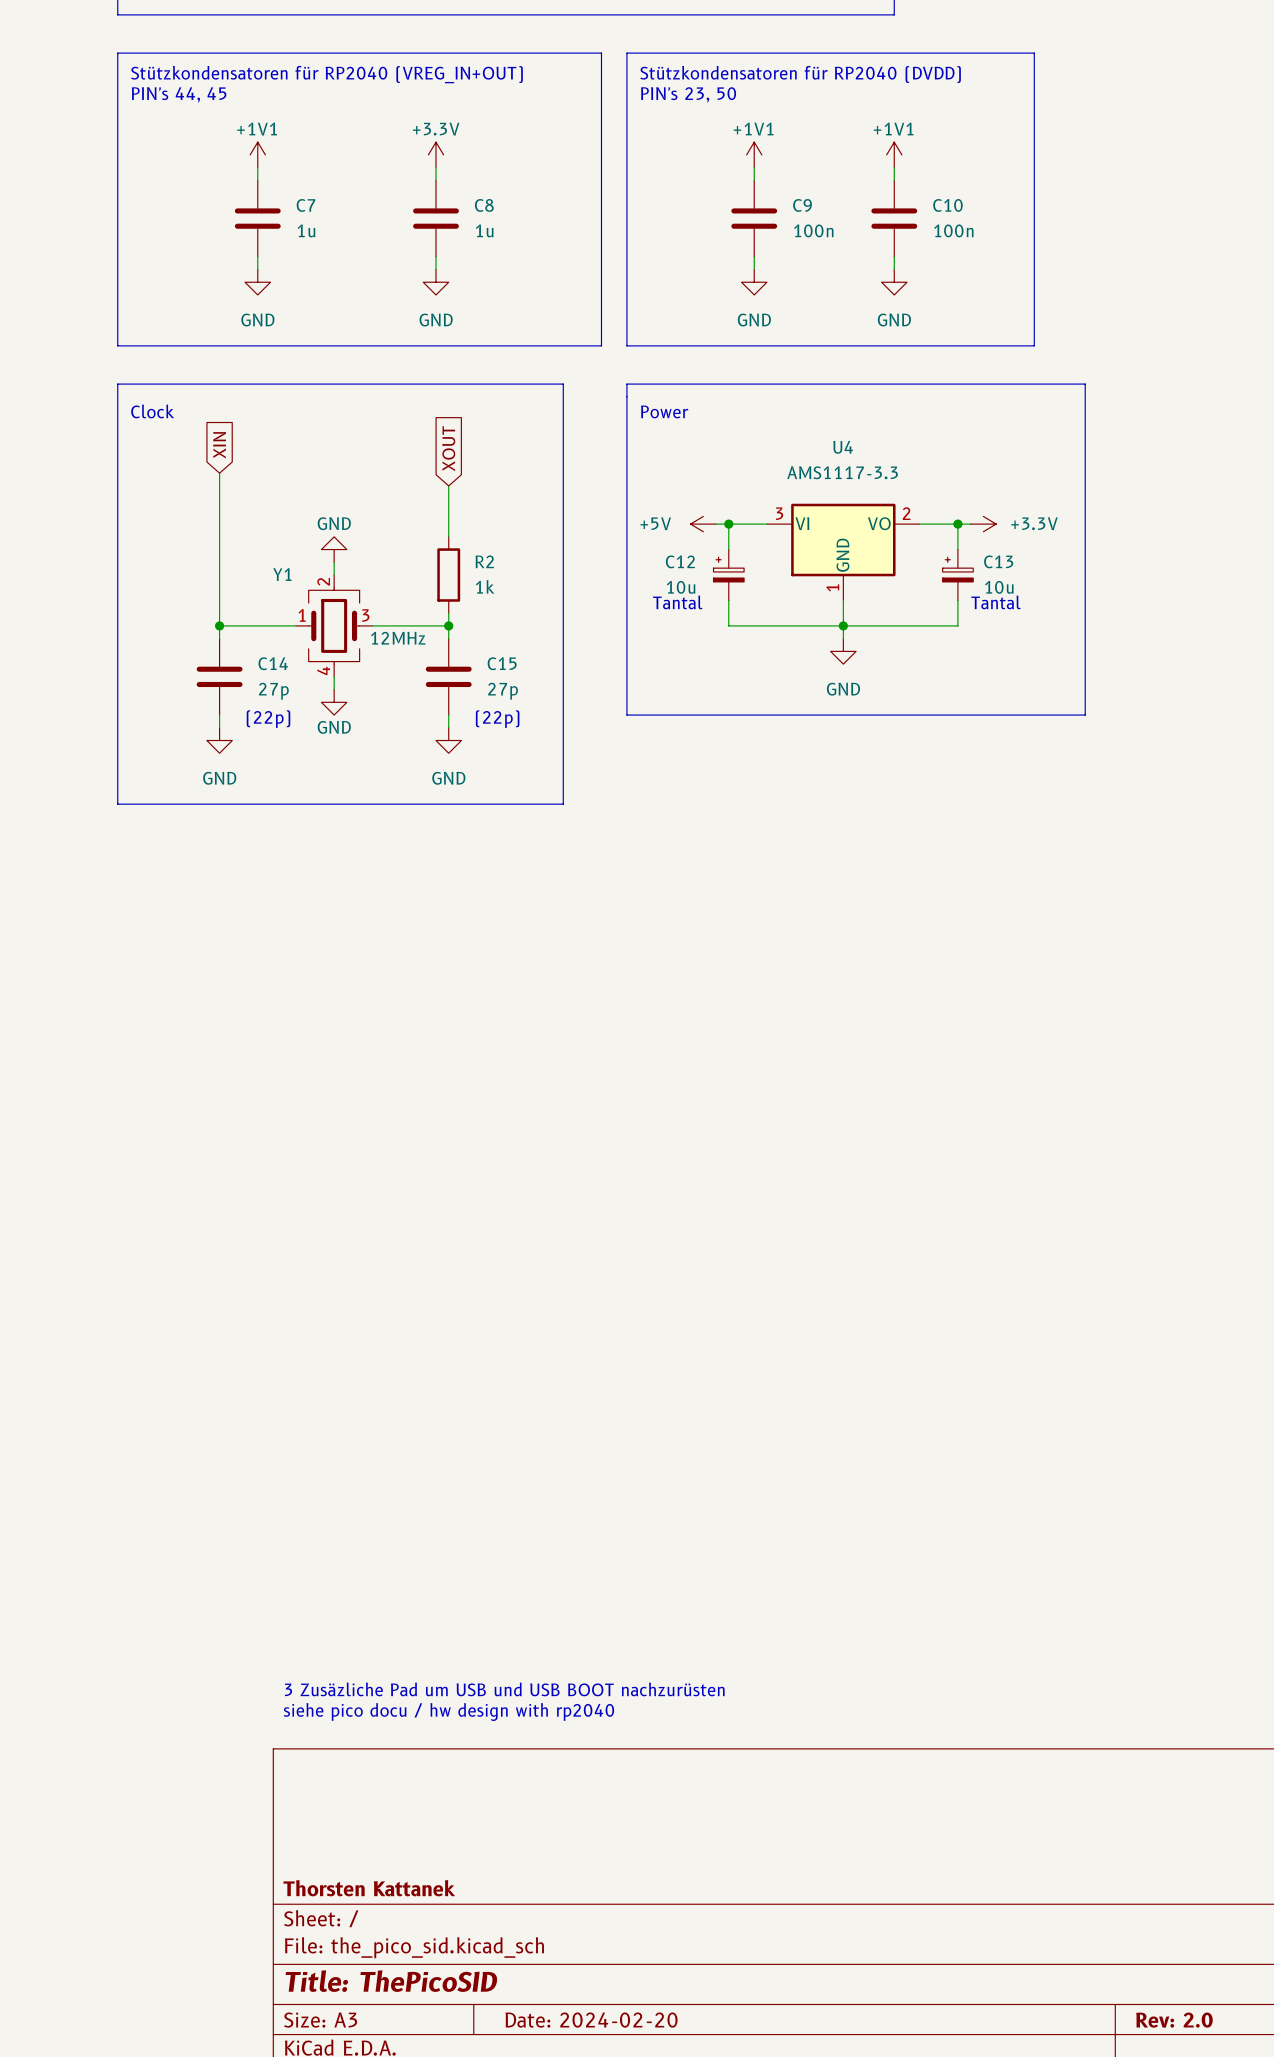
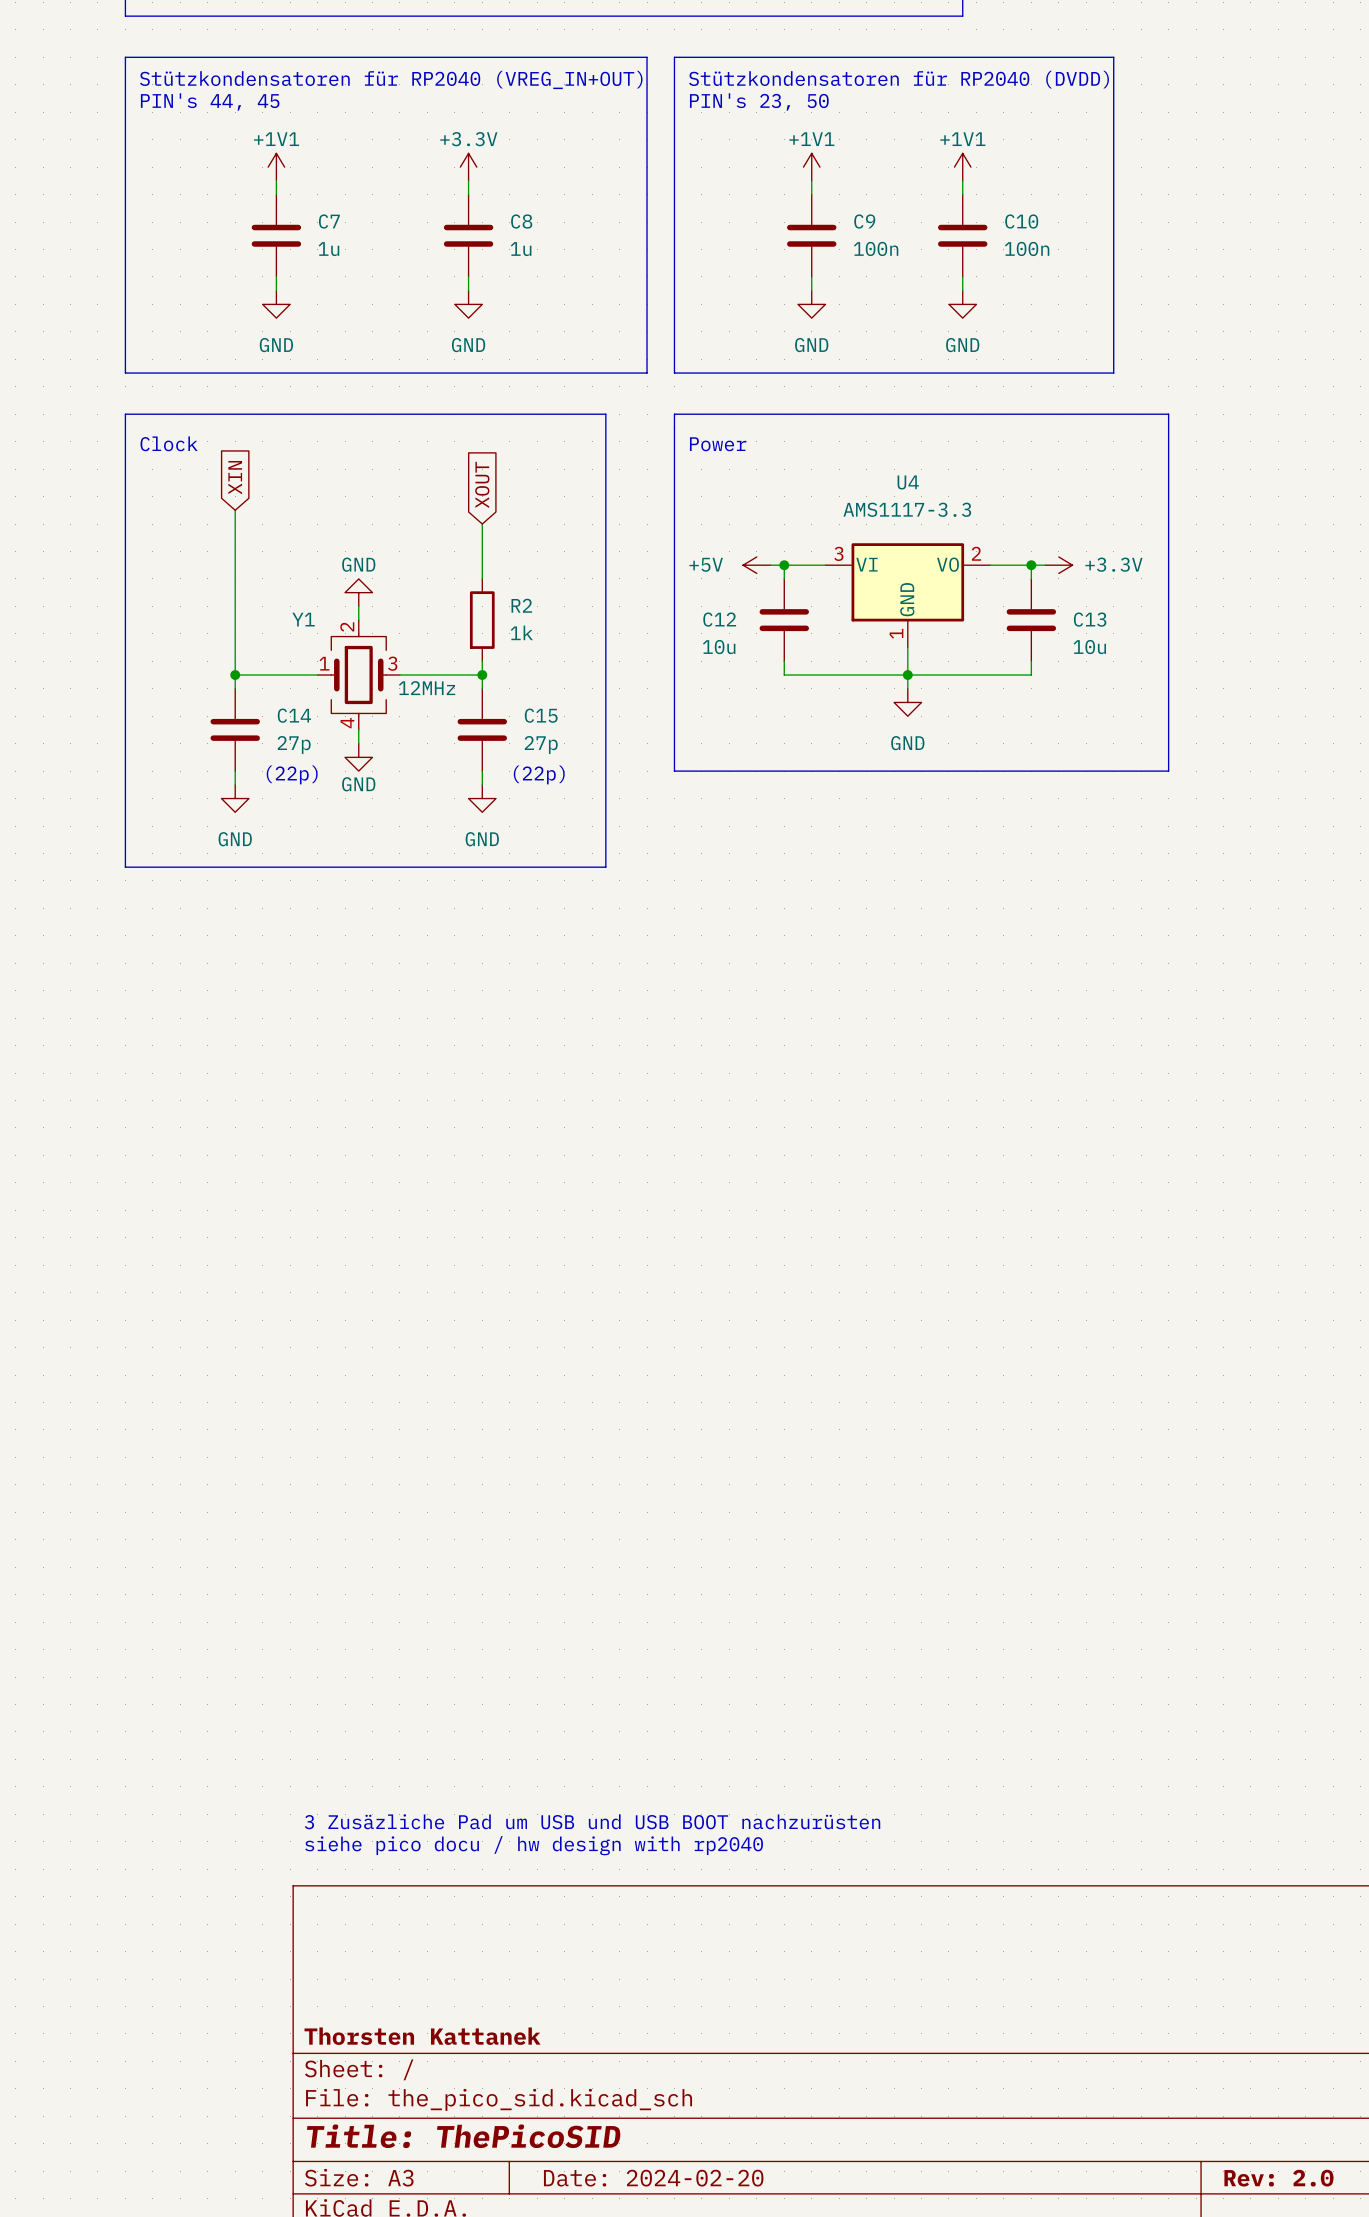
C12 symbol: [713, 549, 745, 601] -> [759, 578, 809, 662]
C13 symbol: [942, 549, 974, 601] -> [1006, 578, 1057, 662]
text: Tantal (677, 602) -> none
text: Tantal (995, 602) -> none

